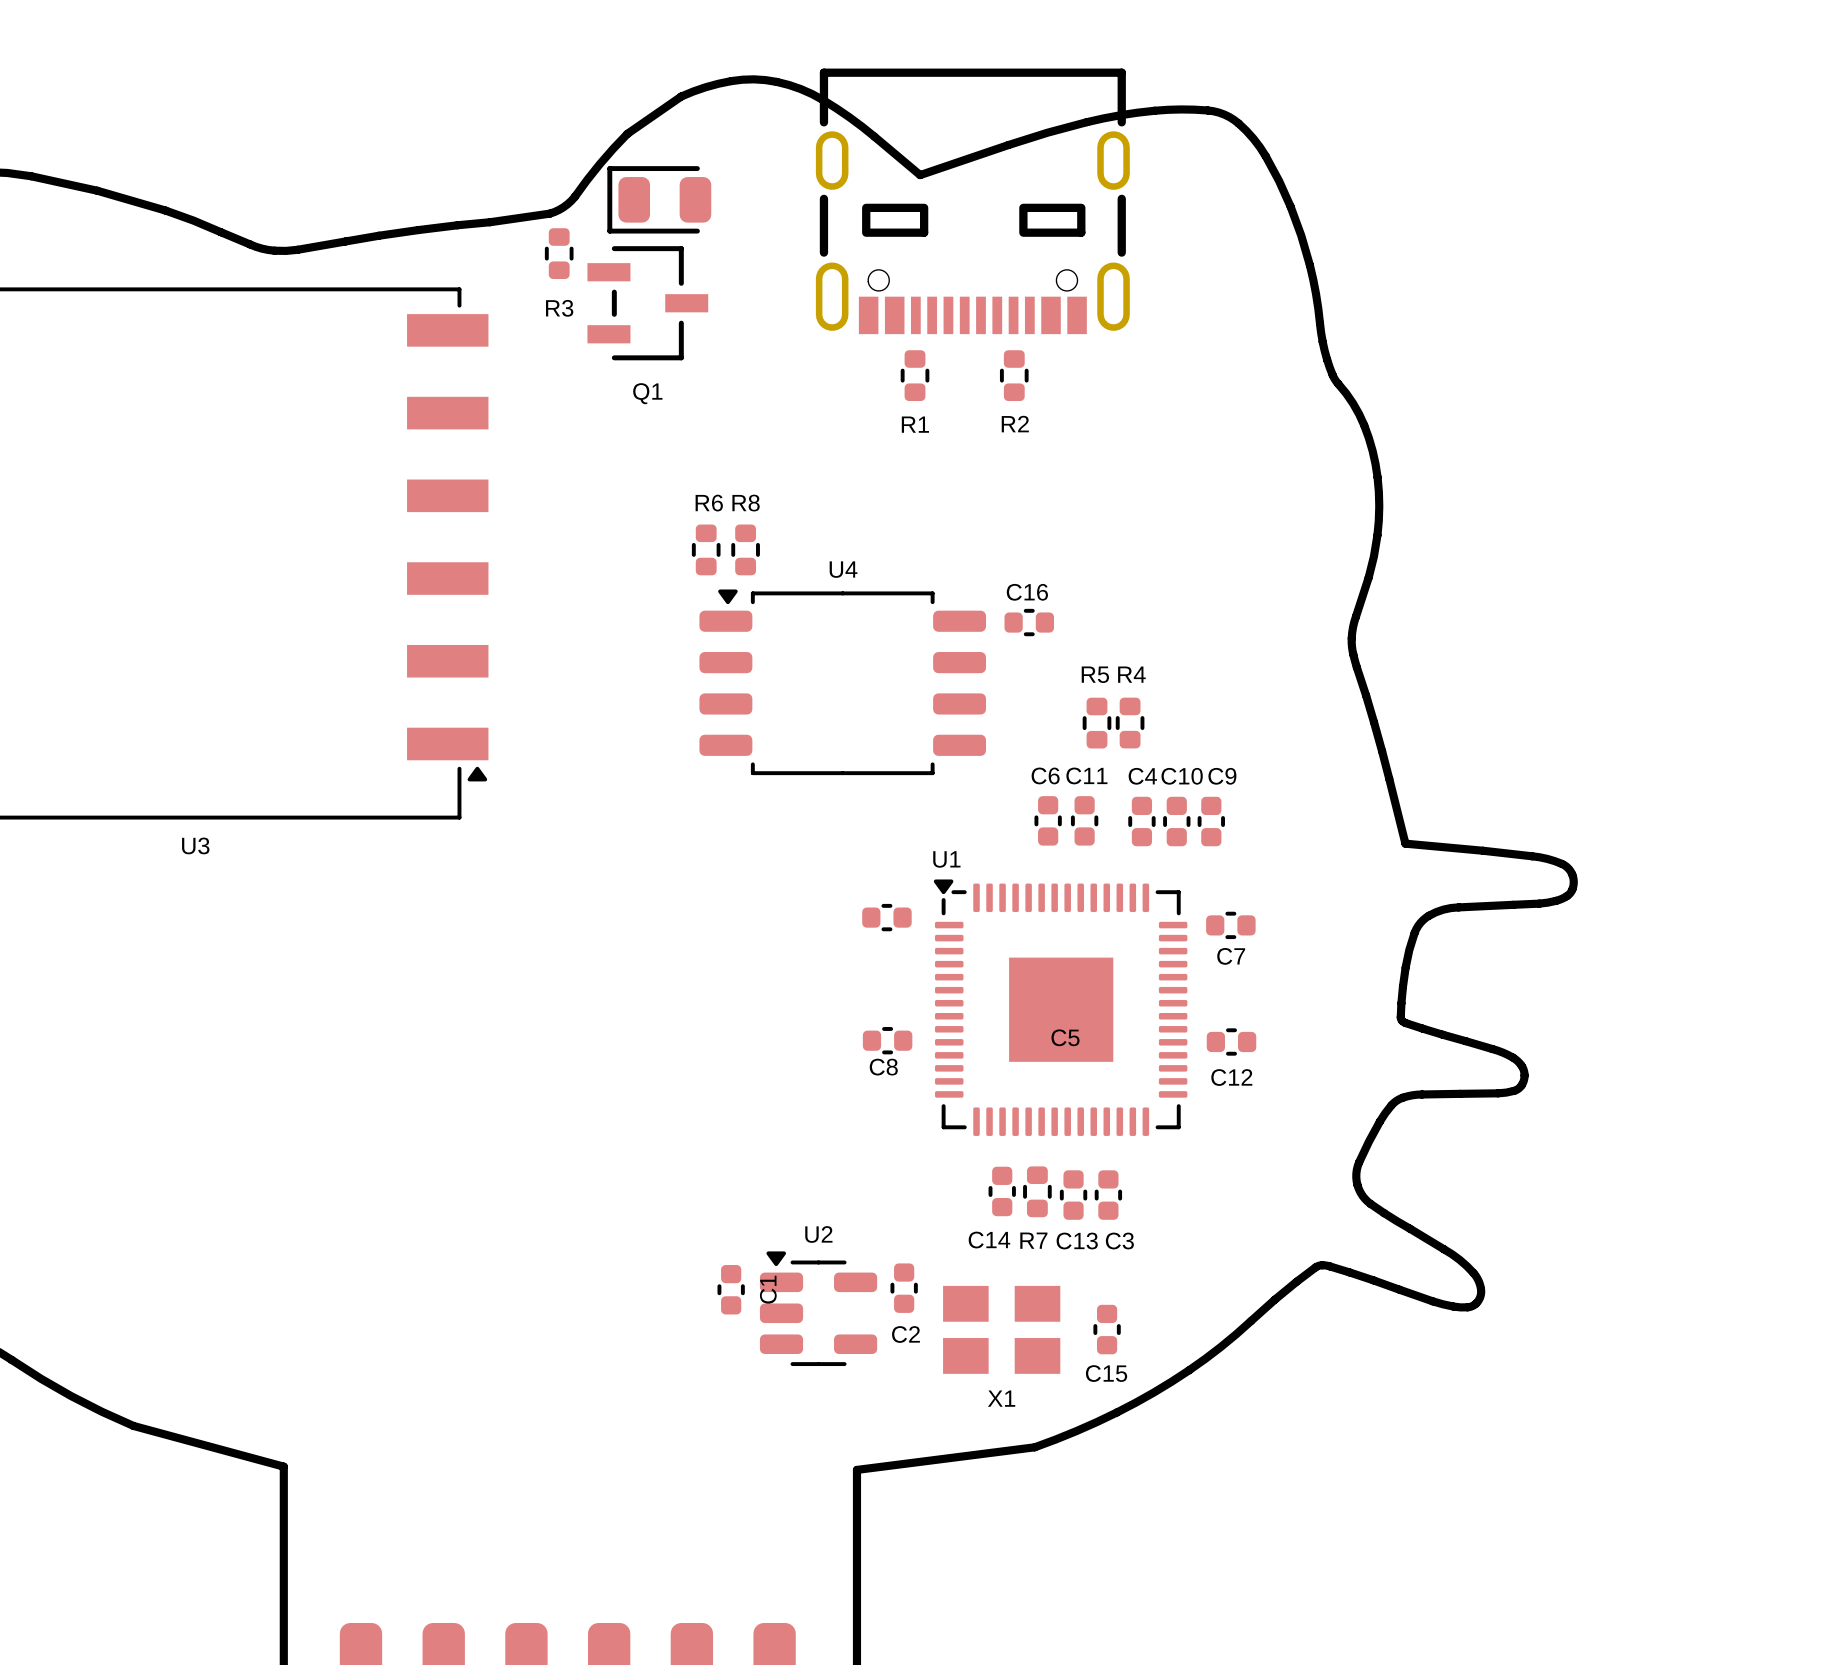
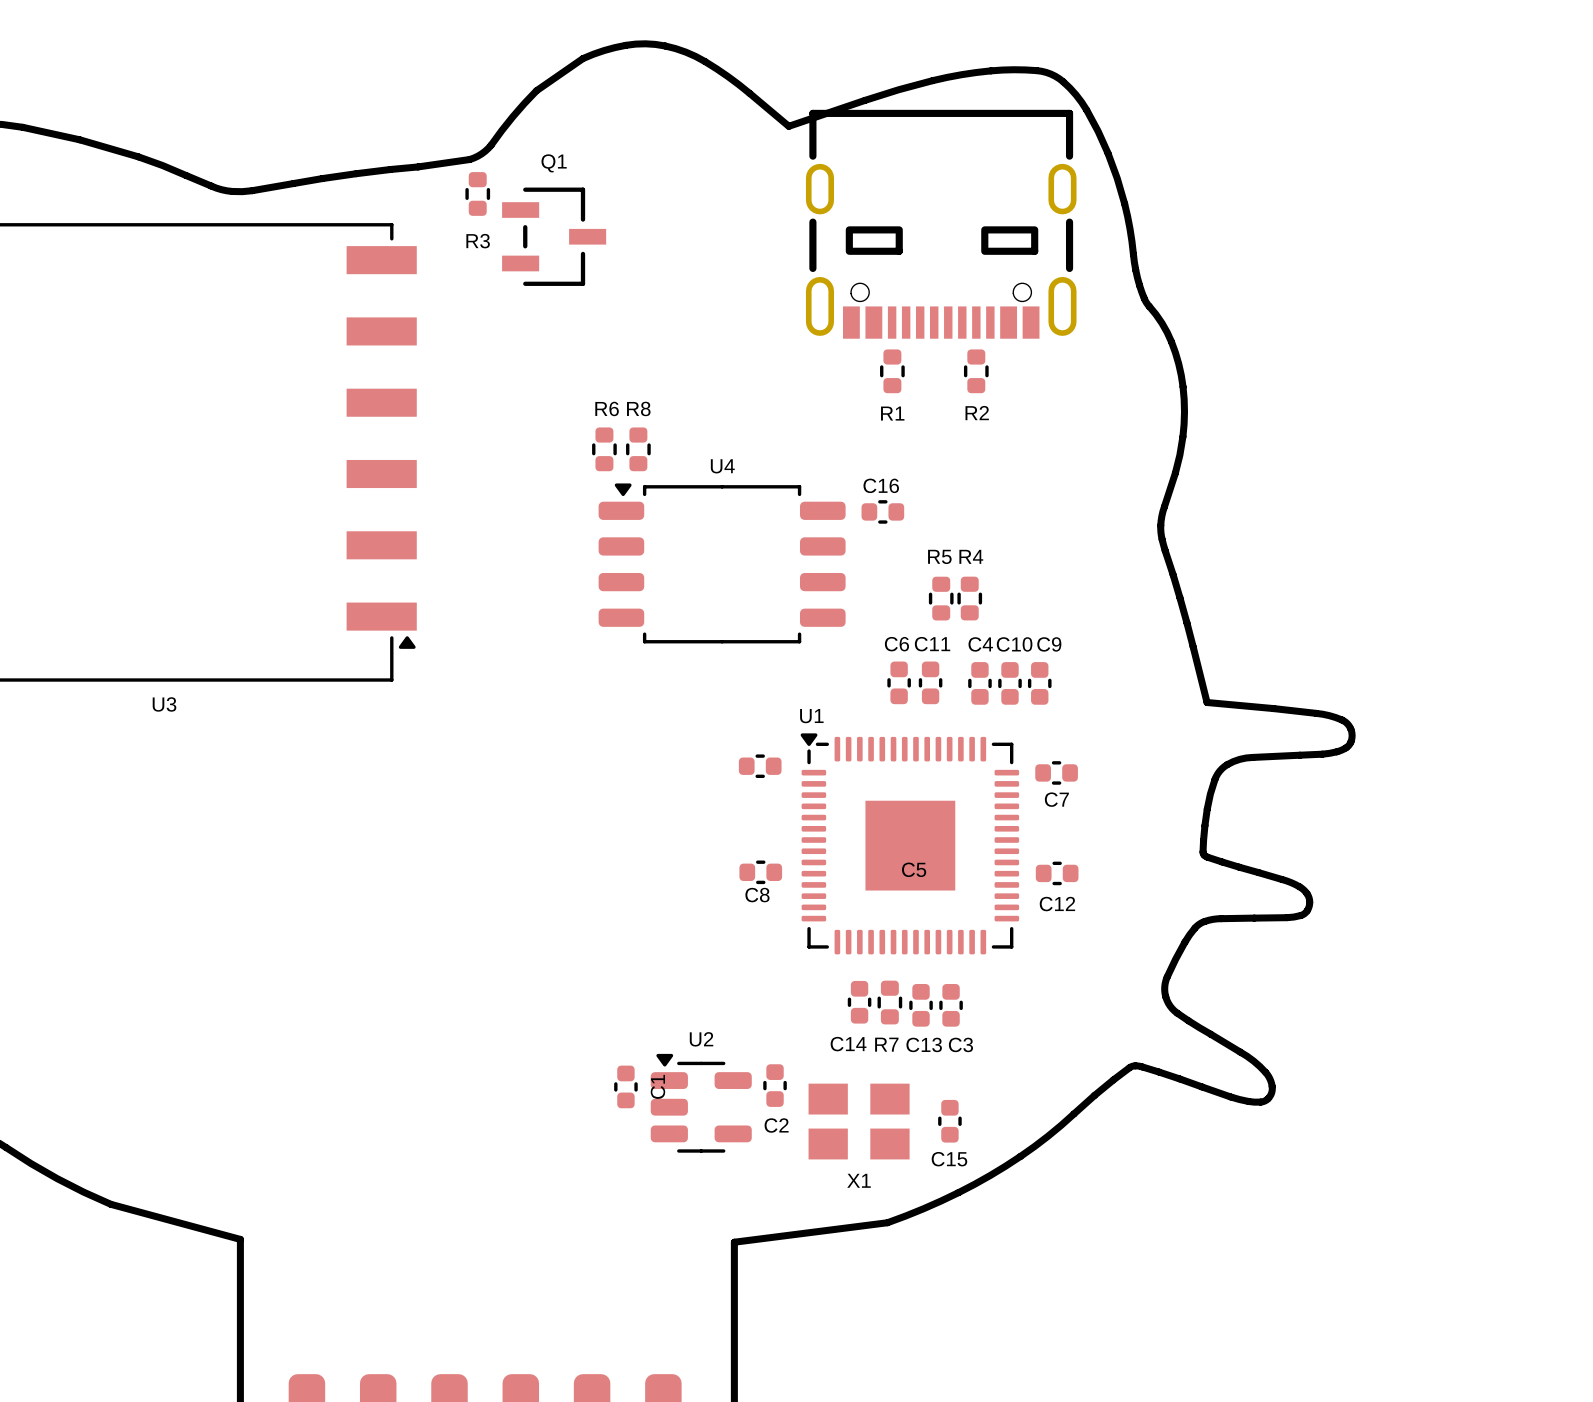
part: (659, 199) -> none
part position: (972, 201) -> (941, 224)
R1 position: (915, 375) -> (892, 371)
R2 position: (1014, 375) -> (976, 371)
Q1 name position: Q1 (647, 393) -> Q1 (554, 163)

